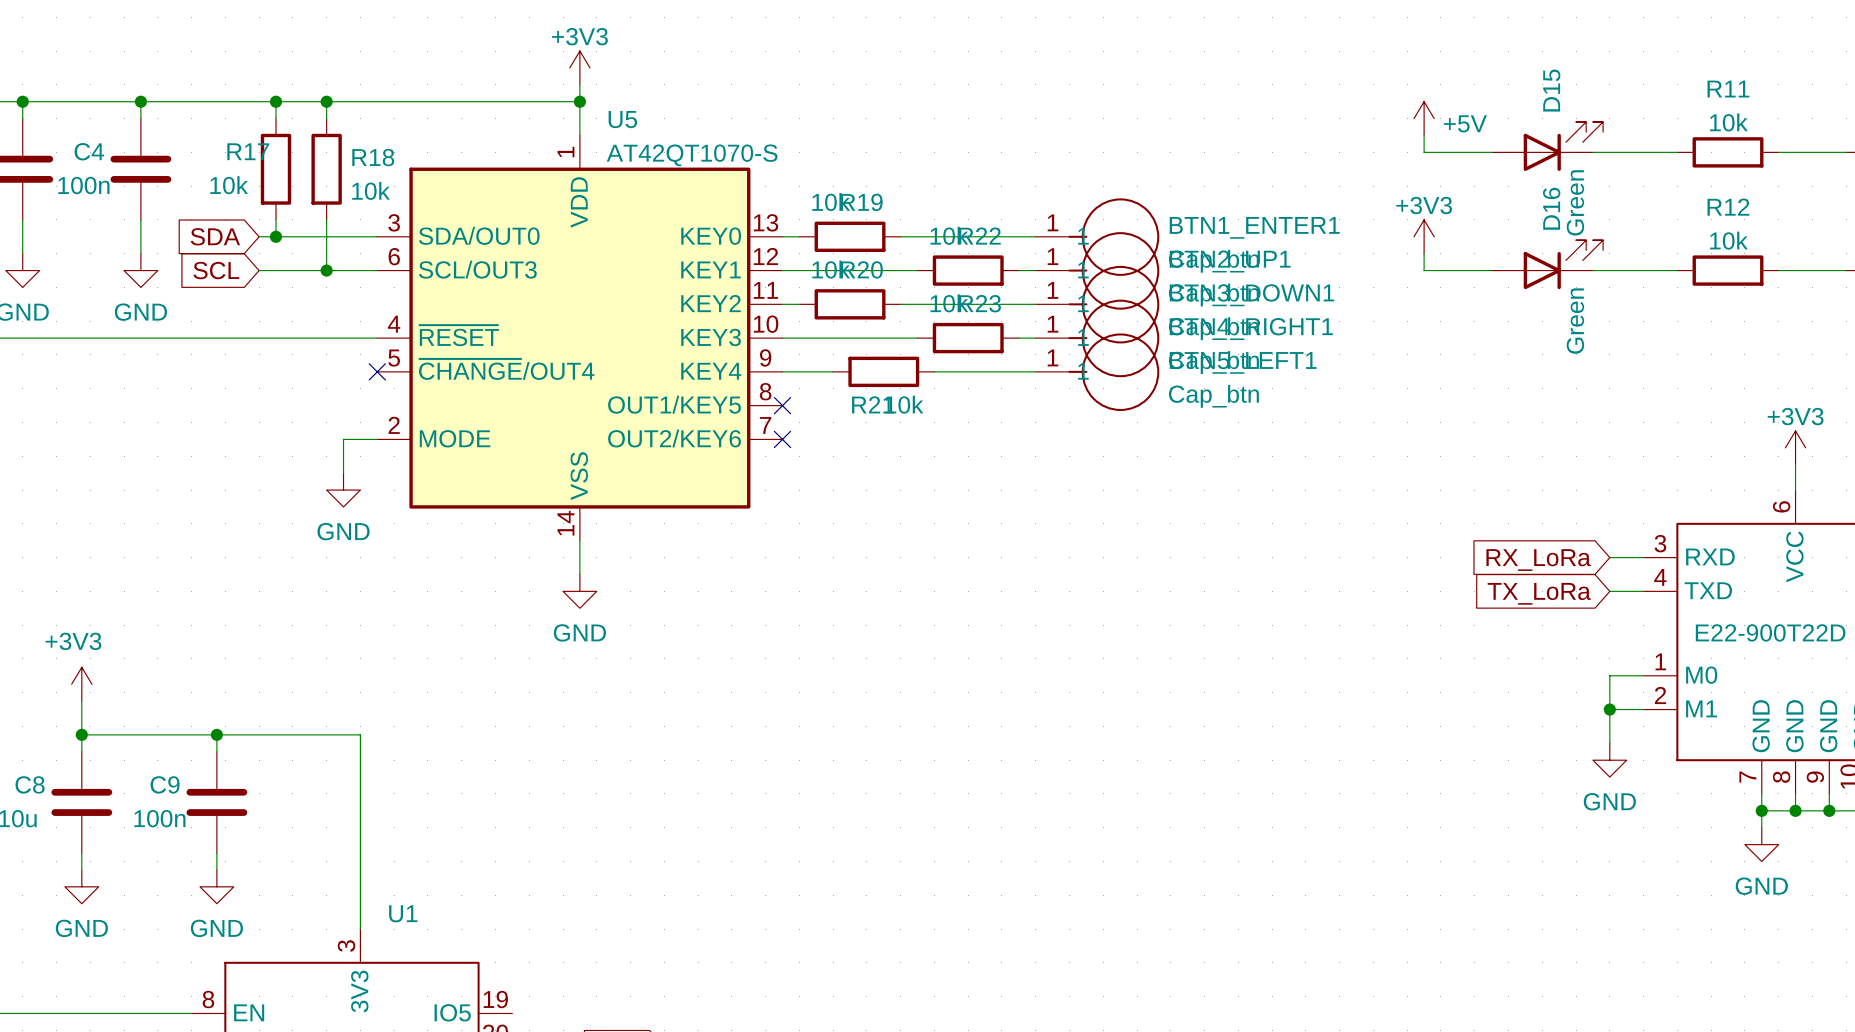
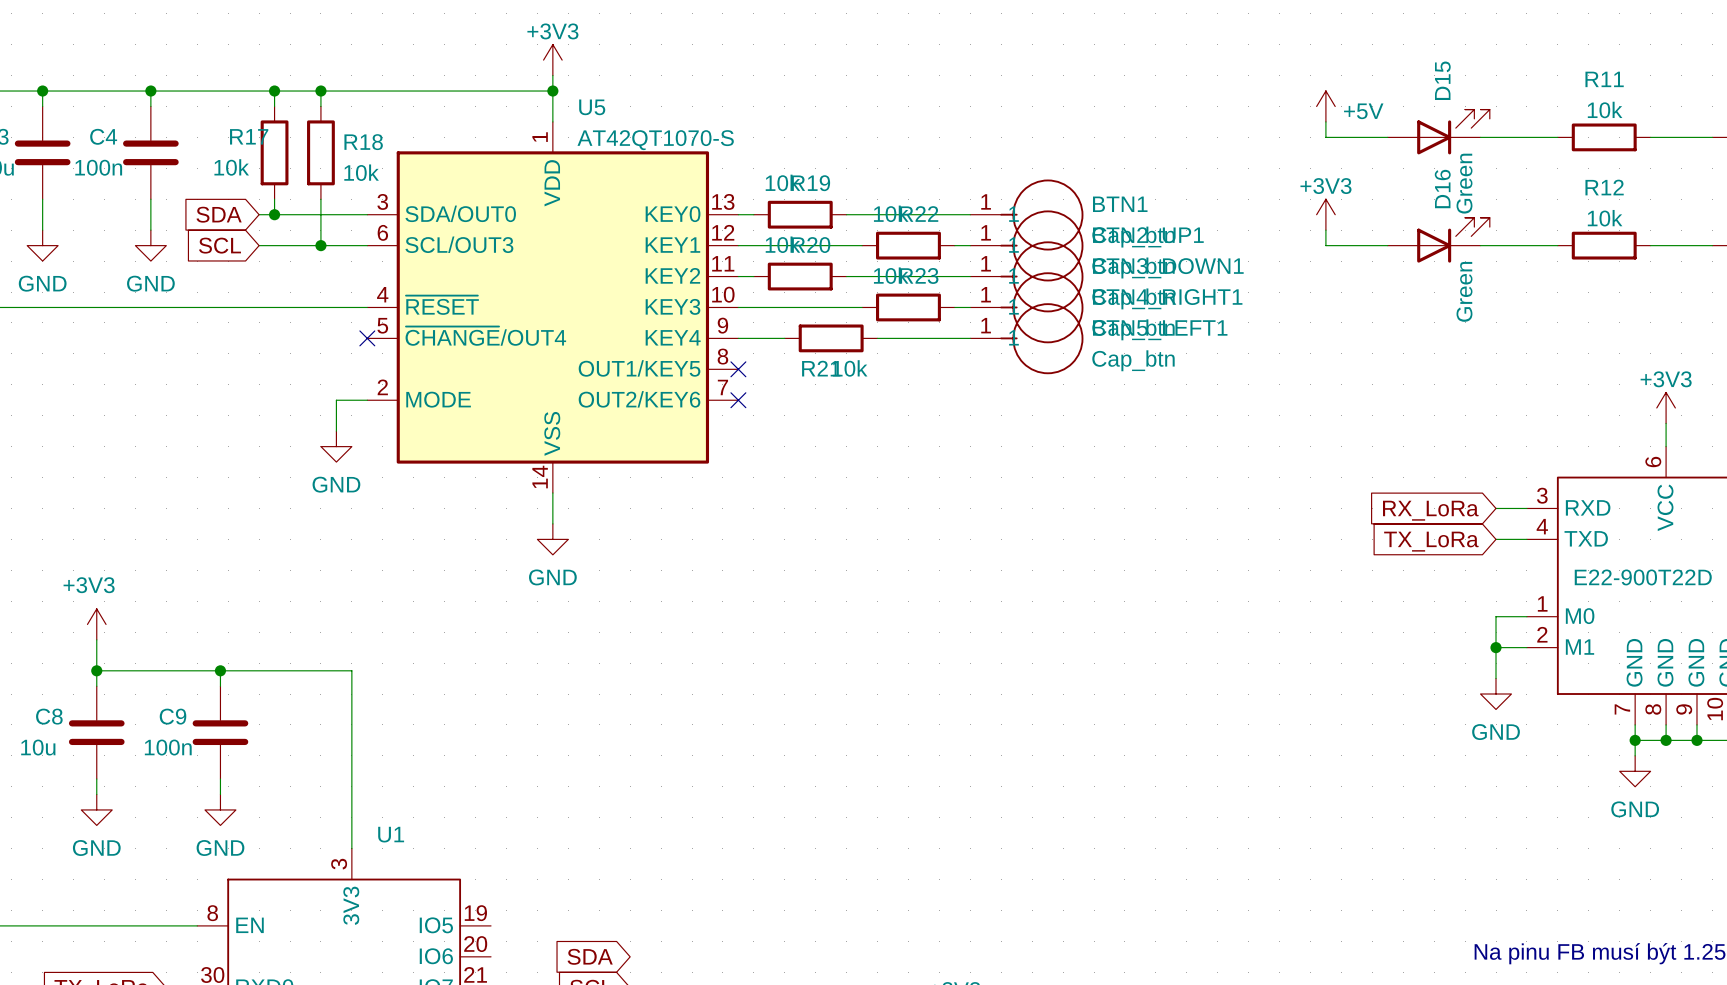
BTN1_ENTER1 name: BTN1_ENTER1 (1254, 227) -> BTN1 (1120, 204)

